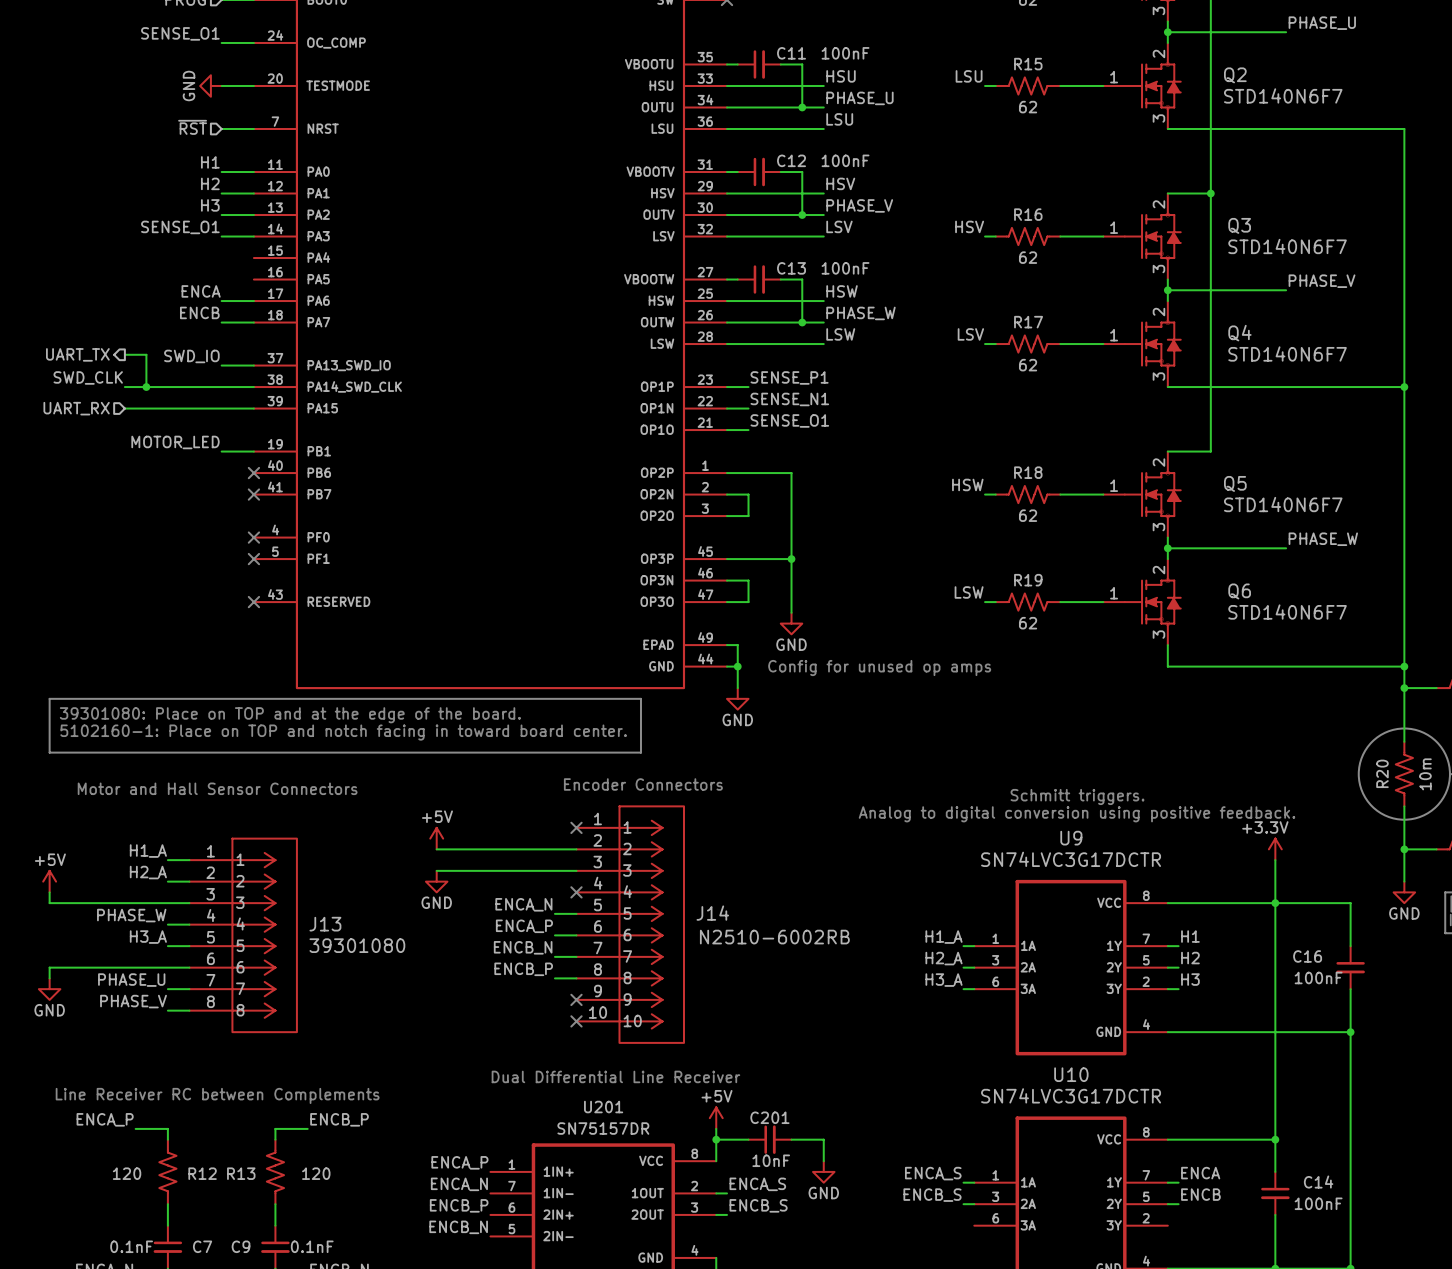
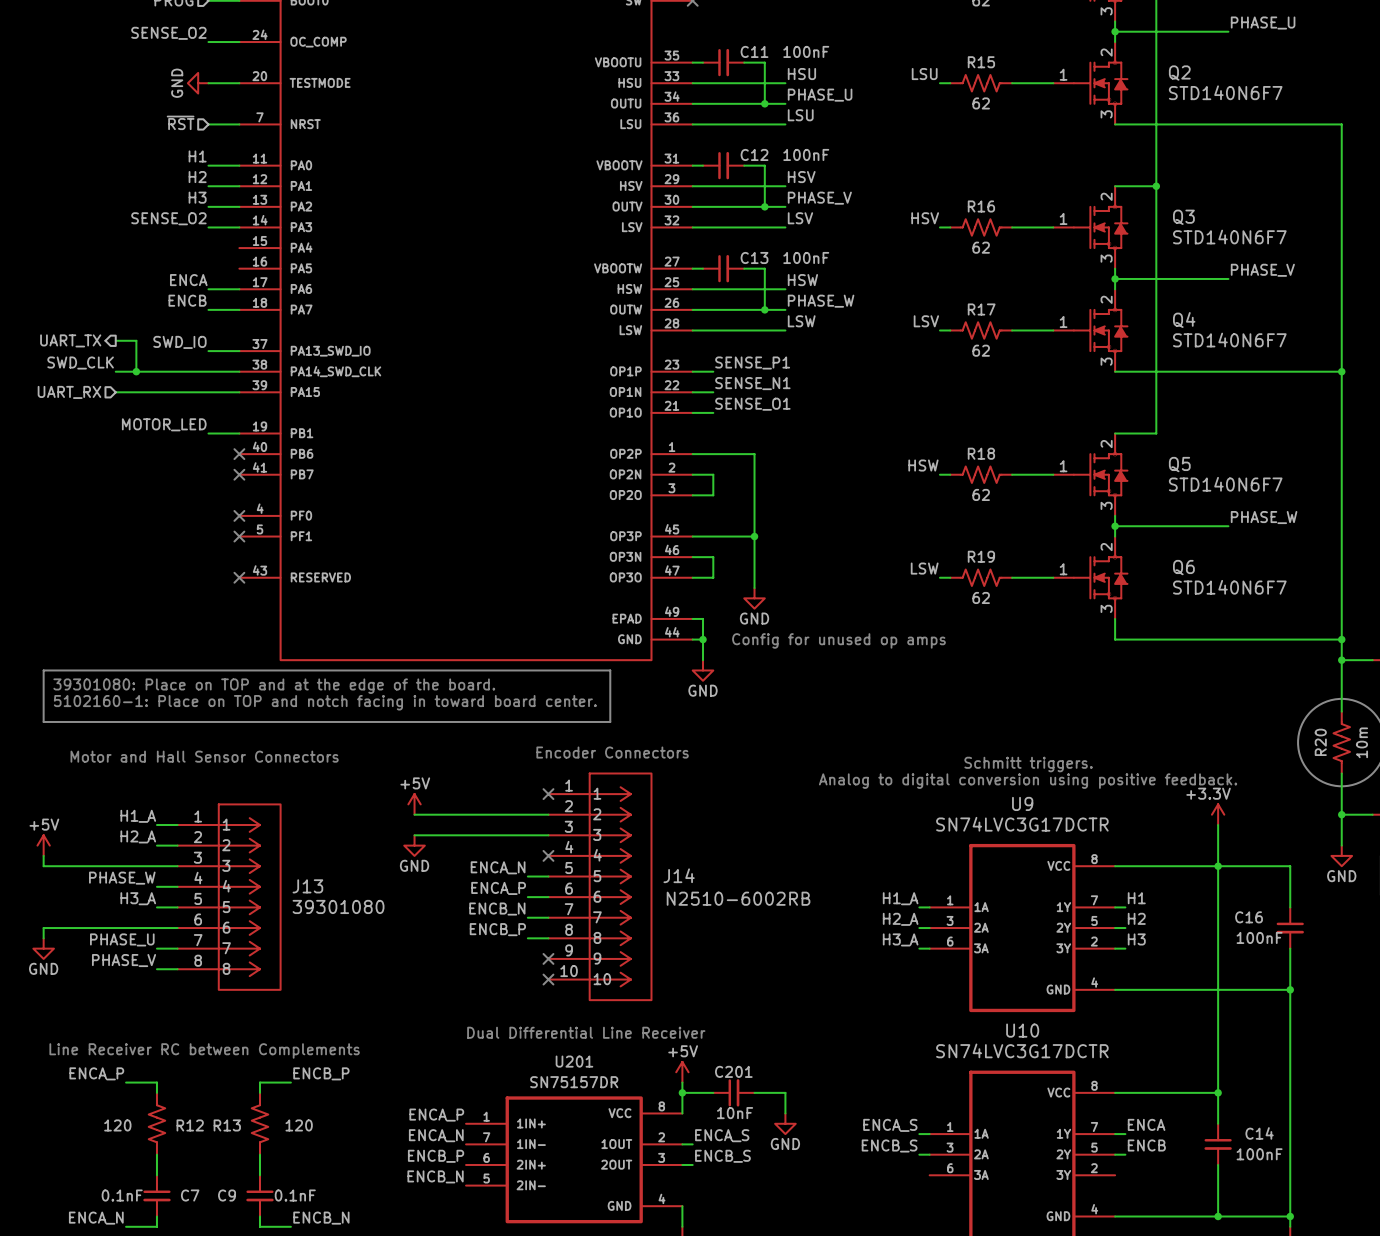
label: SENSE_O1 (180, 33) -> SENSE_O2 (168, 33)
label: SENSE_O1 (180, 227) -> SENSE_O2 (168, 218)

